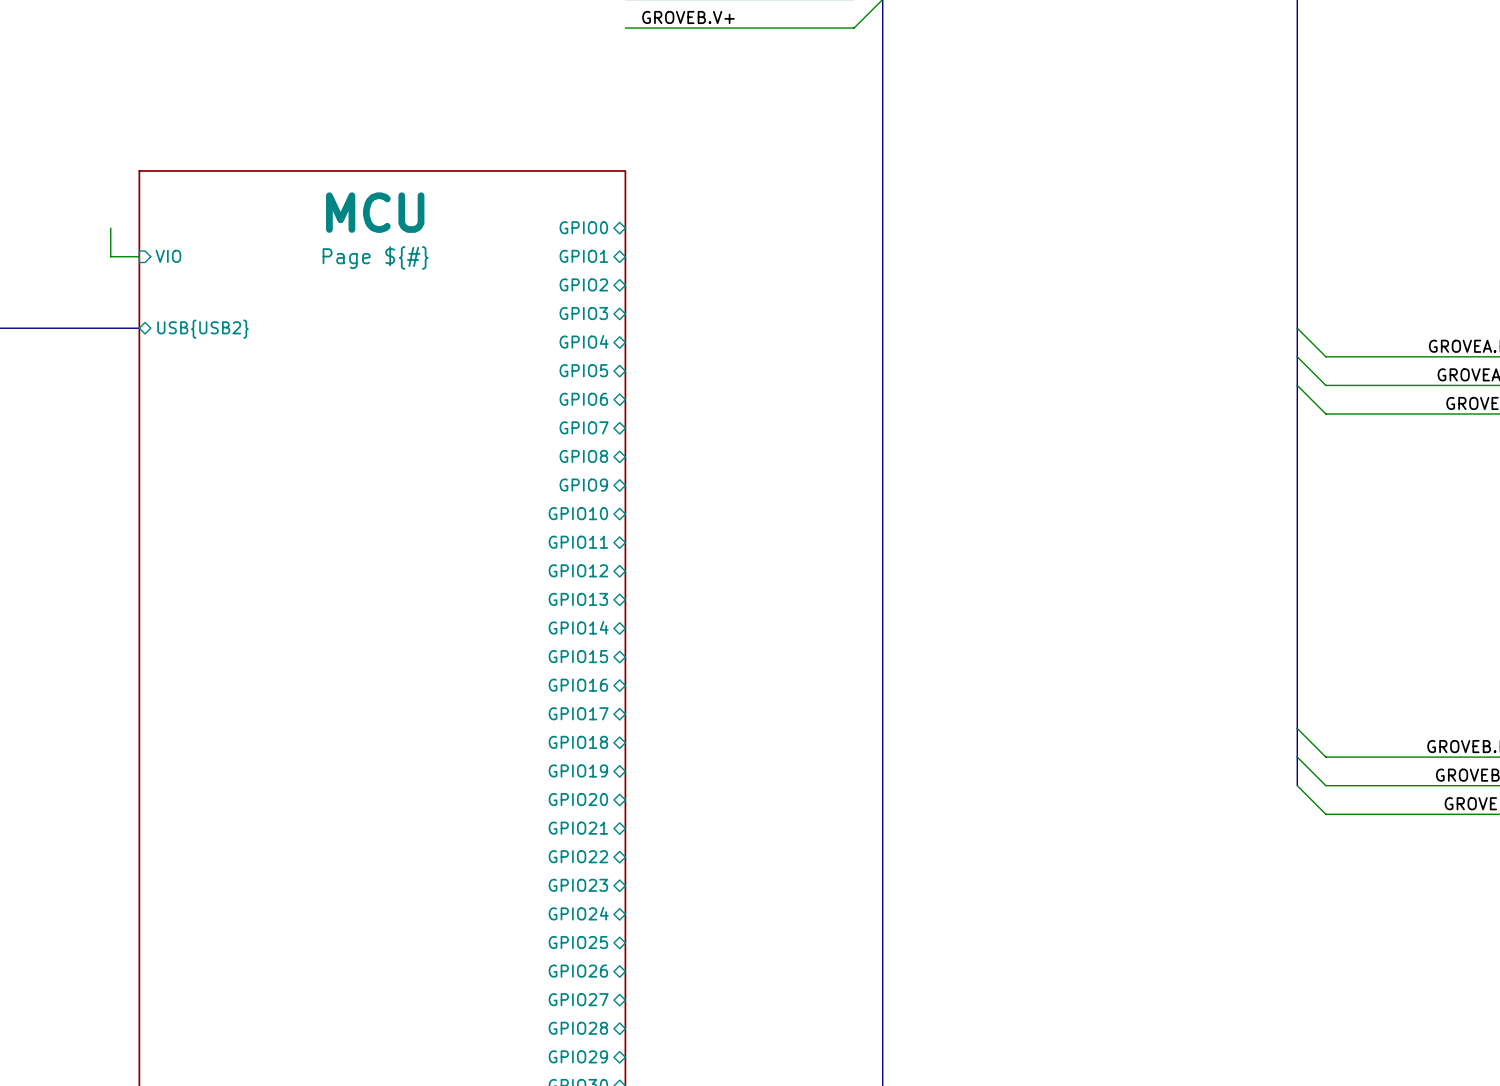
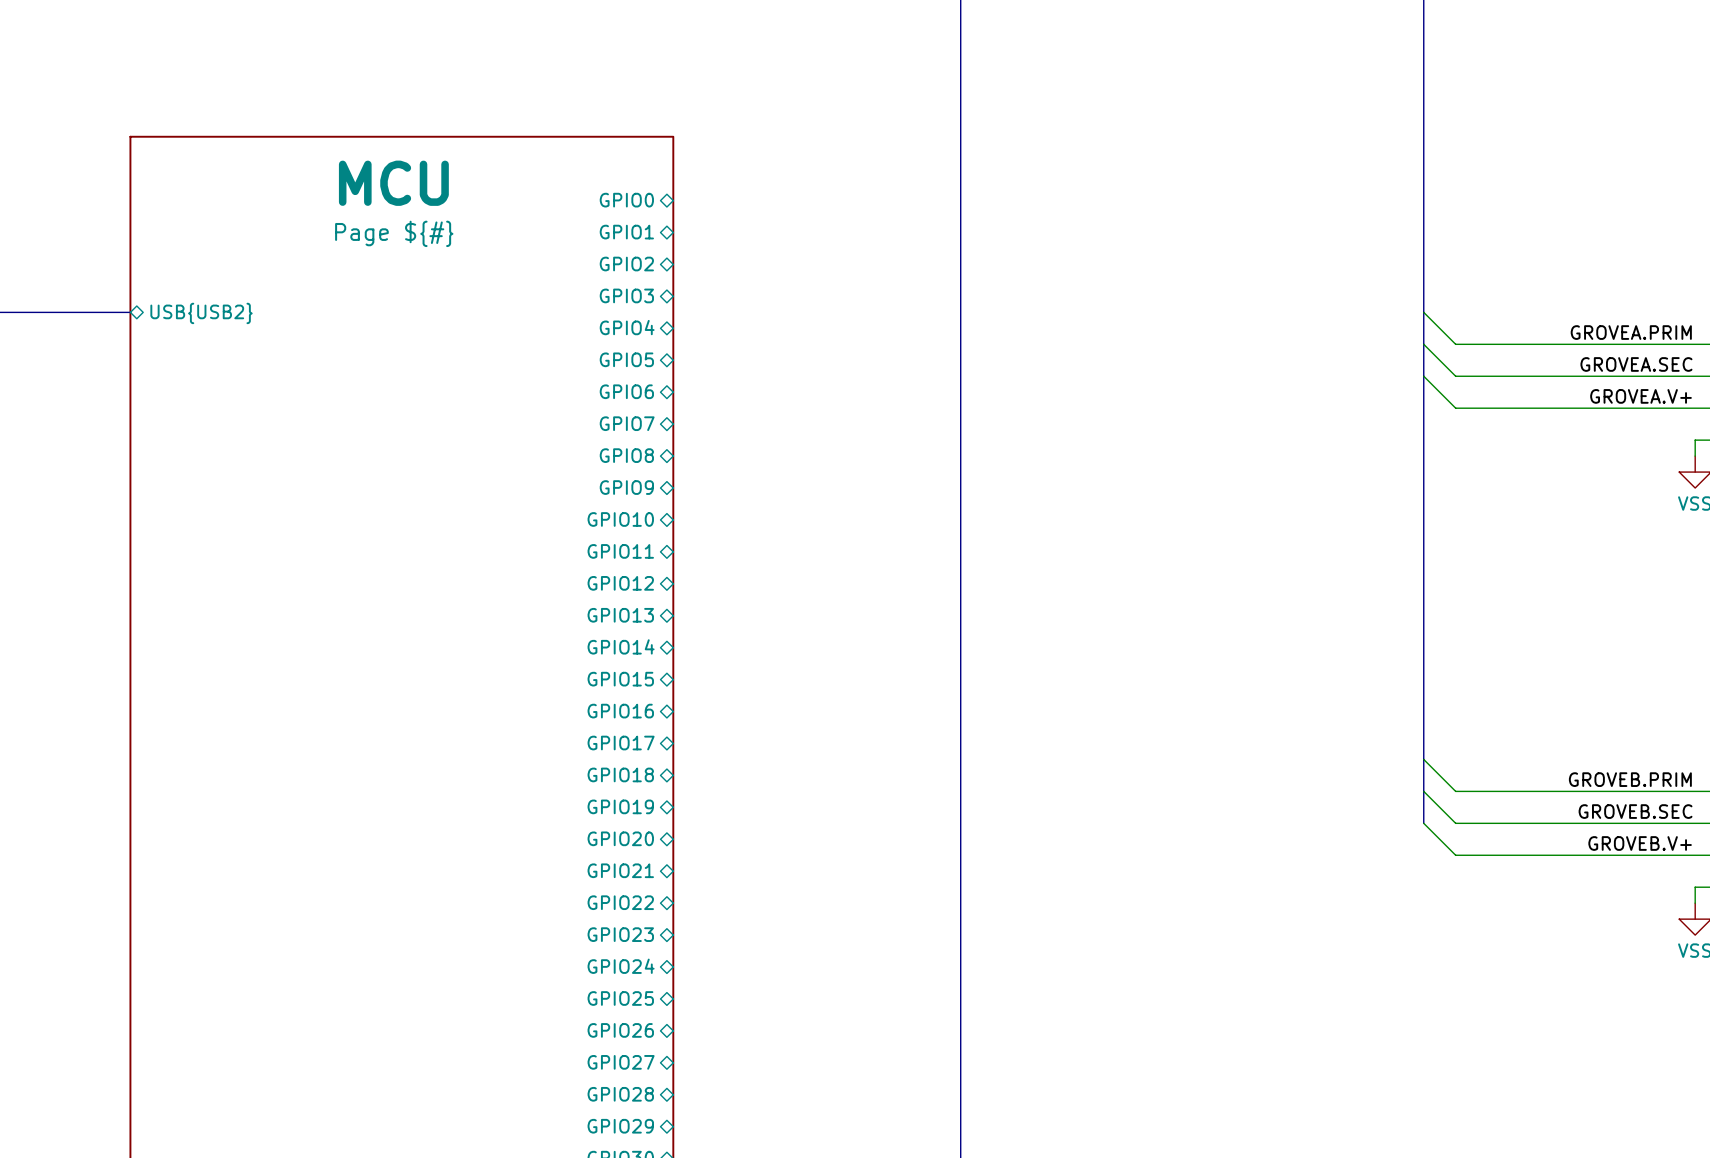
wire: (110, 228) (110, 256) (139, 256) -> none
sheet pin: VIO (168, 256) -> none

